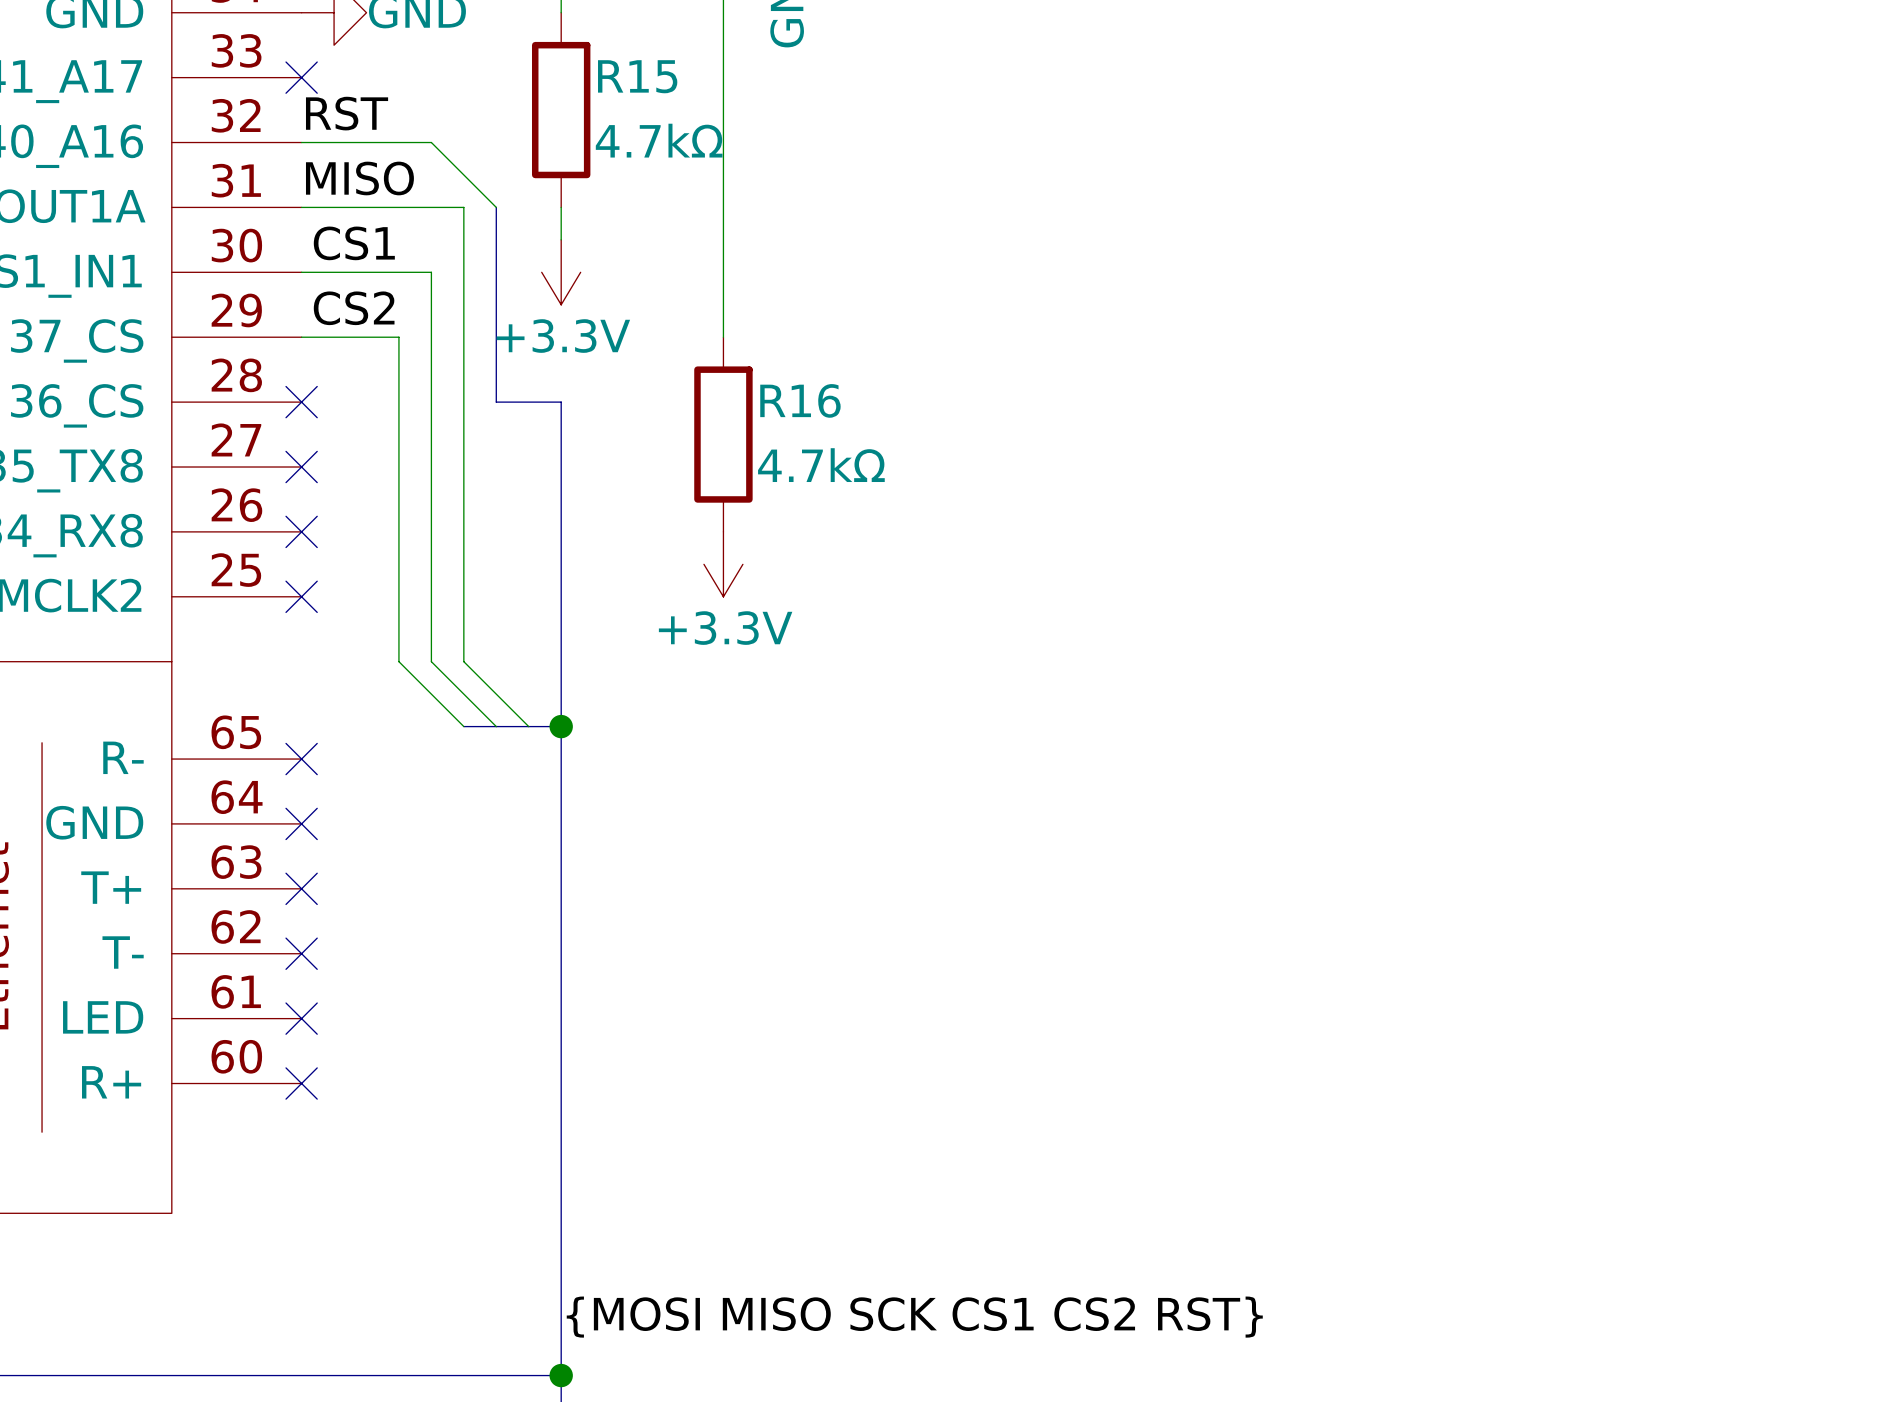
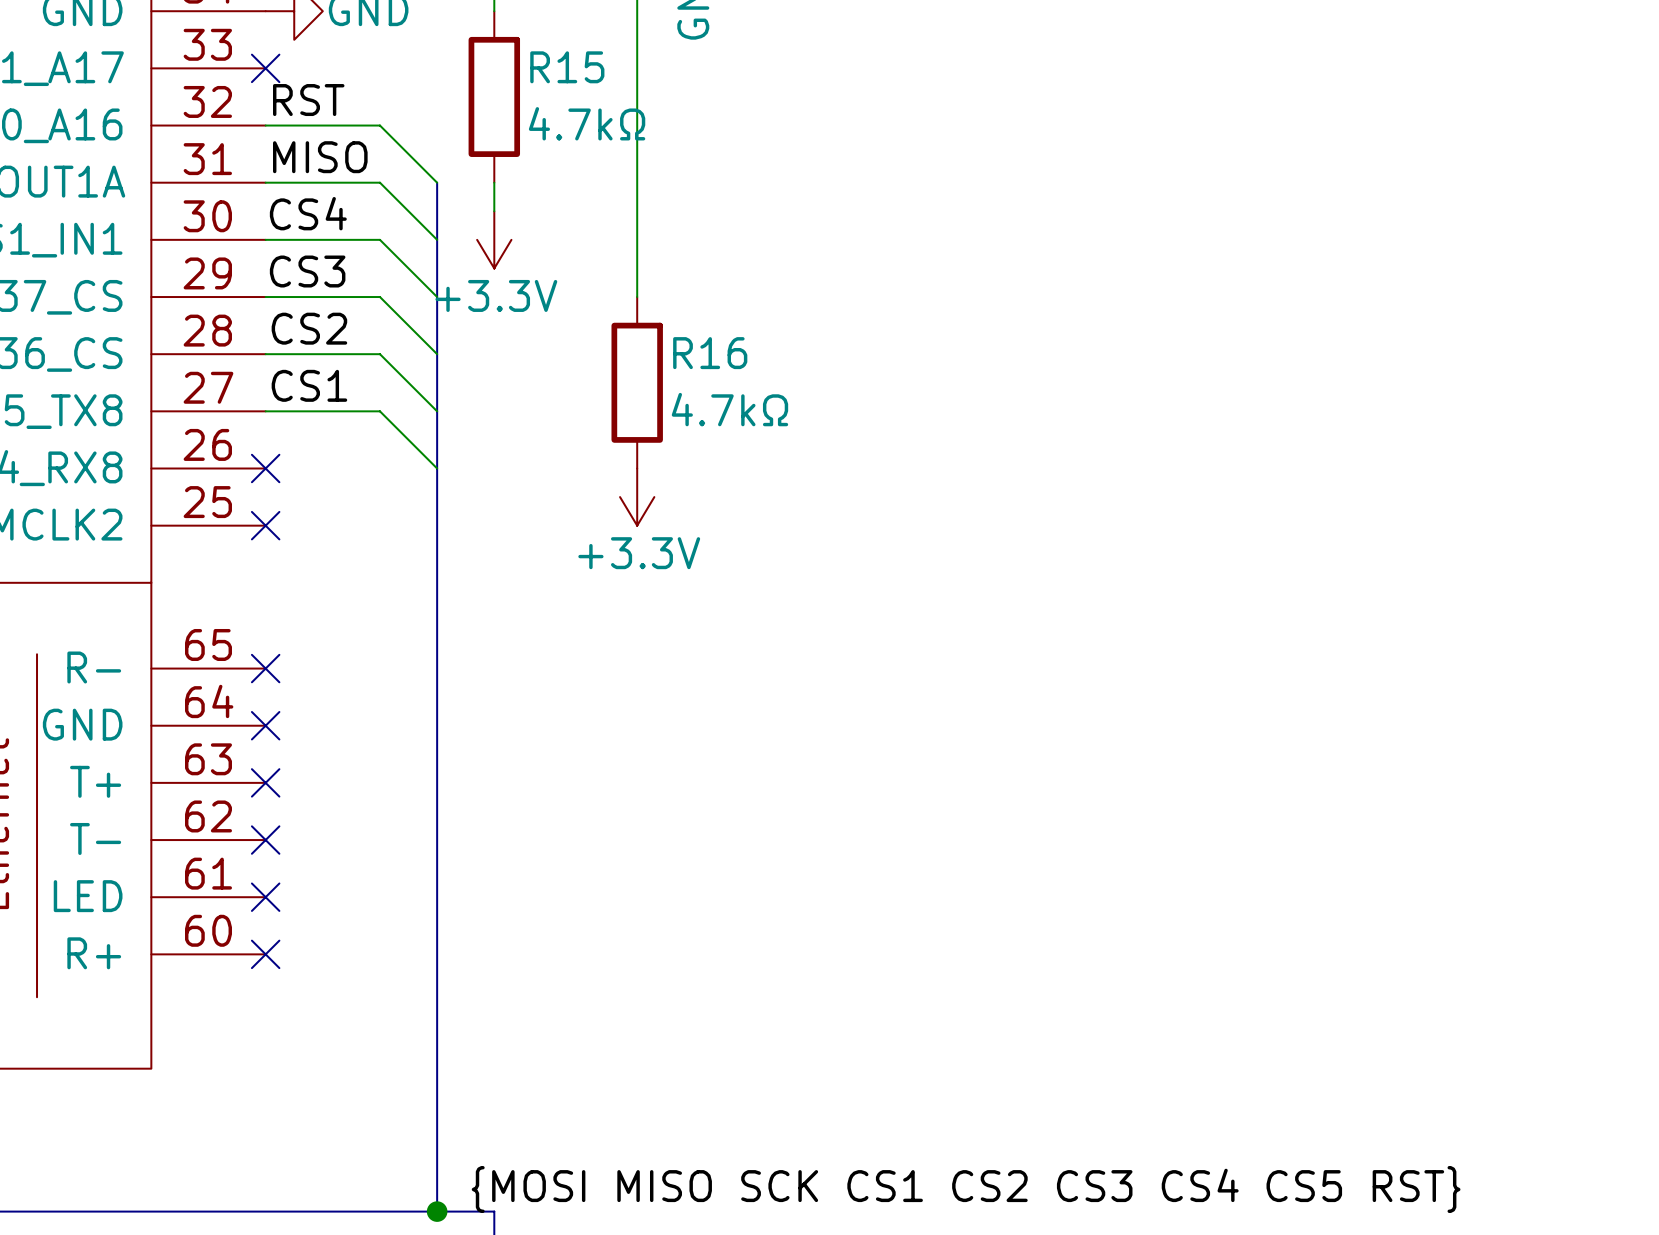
wire: (431, 207) (463, 207) (463, 661) (528, 726) -> (379, 182) (437, 239)
label: CS1 (354, 243) -> CS4 (308, 213)
wire: (431, 272) (431, 661) (496, 726) -> (379, 239) (437, 297)
label: CS2 (354, 308) -> CS3 (307, 271)
wire: (398, 337) (398, 661) (463, 726) -> (351, 297) (379, 297) (437, 354)
label: none -> CS2 (309, 328)
wire: none -> (265, 354) (379, 354) (437, 411)
no-connect mark: (301, 402) -> none
bus: (496, 402) (561, 402) (561, 1375) -> (437, 354) (437, 1211)
label: none -> CS1 (309, 385)
wire: none -> (265, 411) (379, 411) (437, 468)
no-connect mark: (301, 467) -> none
bus: (463, 726) (561, 726) -> none
junction: (561, 726) -> none
label: {MOSI MISO SCK CS1 CS2 RST} (914, 1317) -> {MOSI MISO SCK CS1 CS2 CS3 CS4 CS5 RST} (966, 1189)
junction position: (561, 1375) -> (437, 1211)

